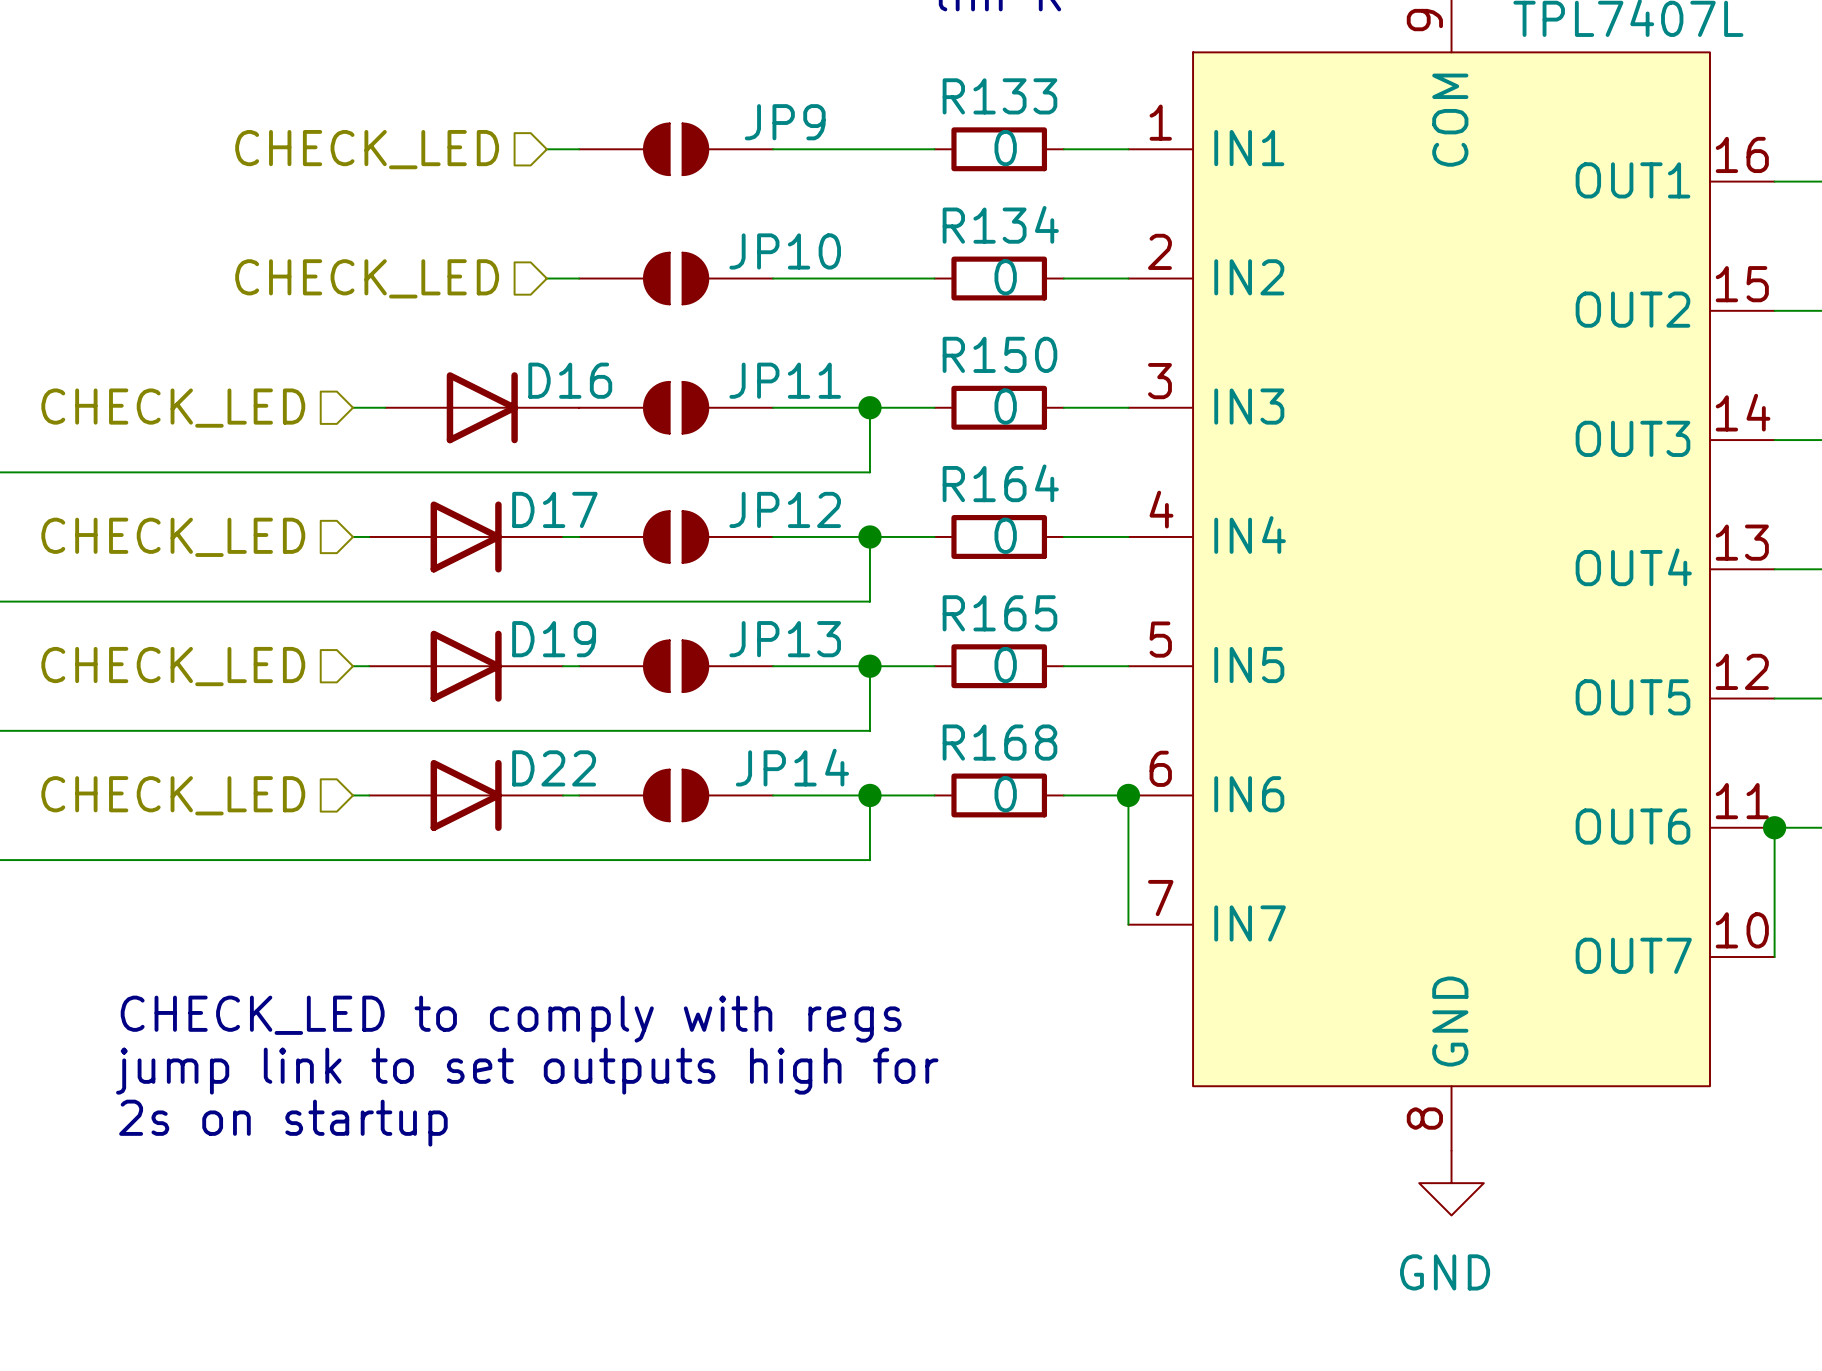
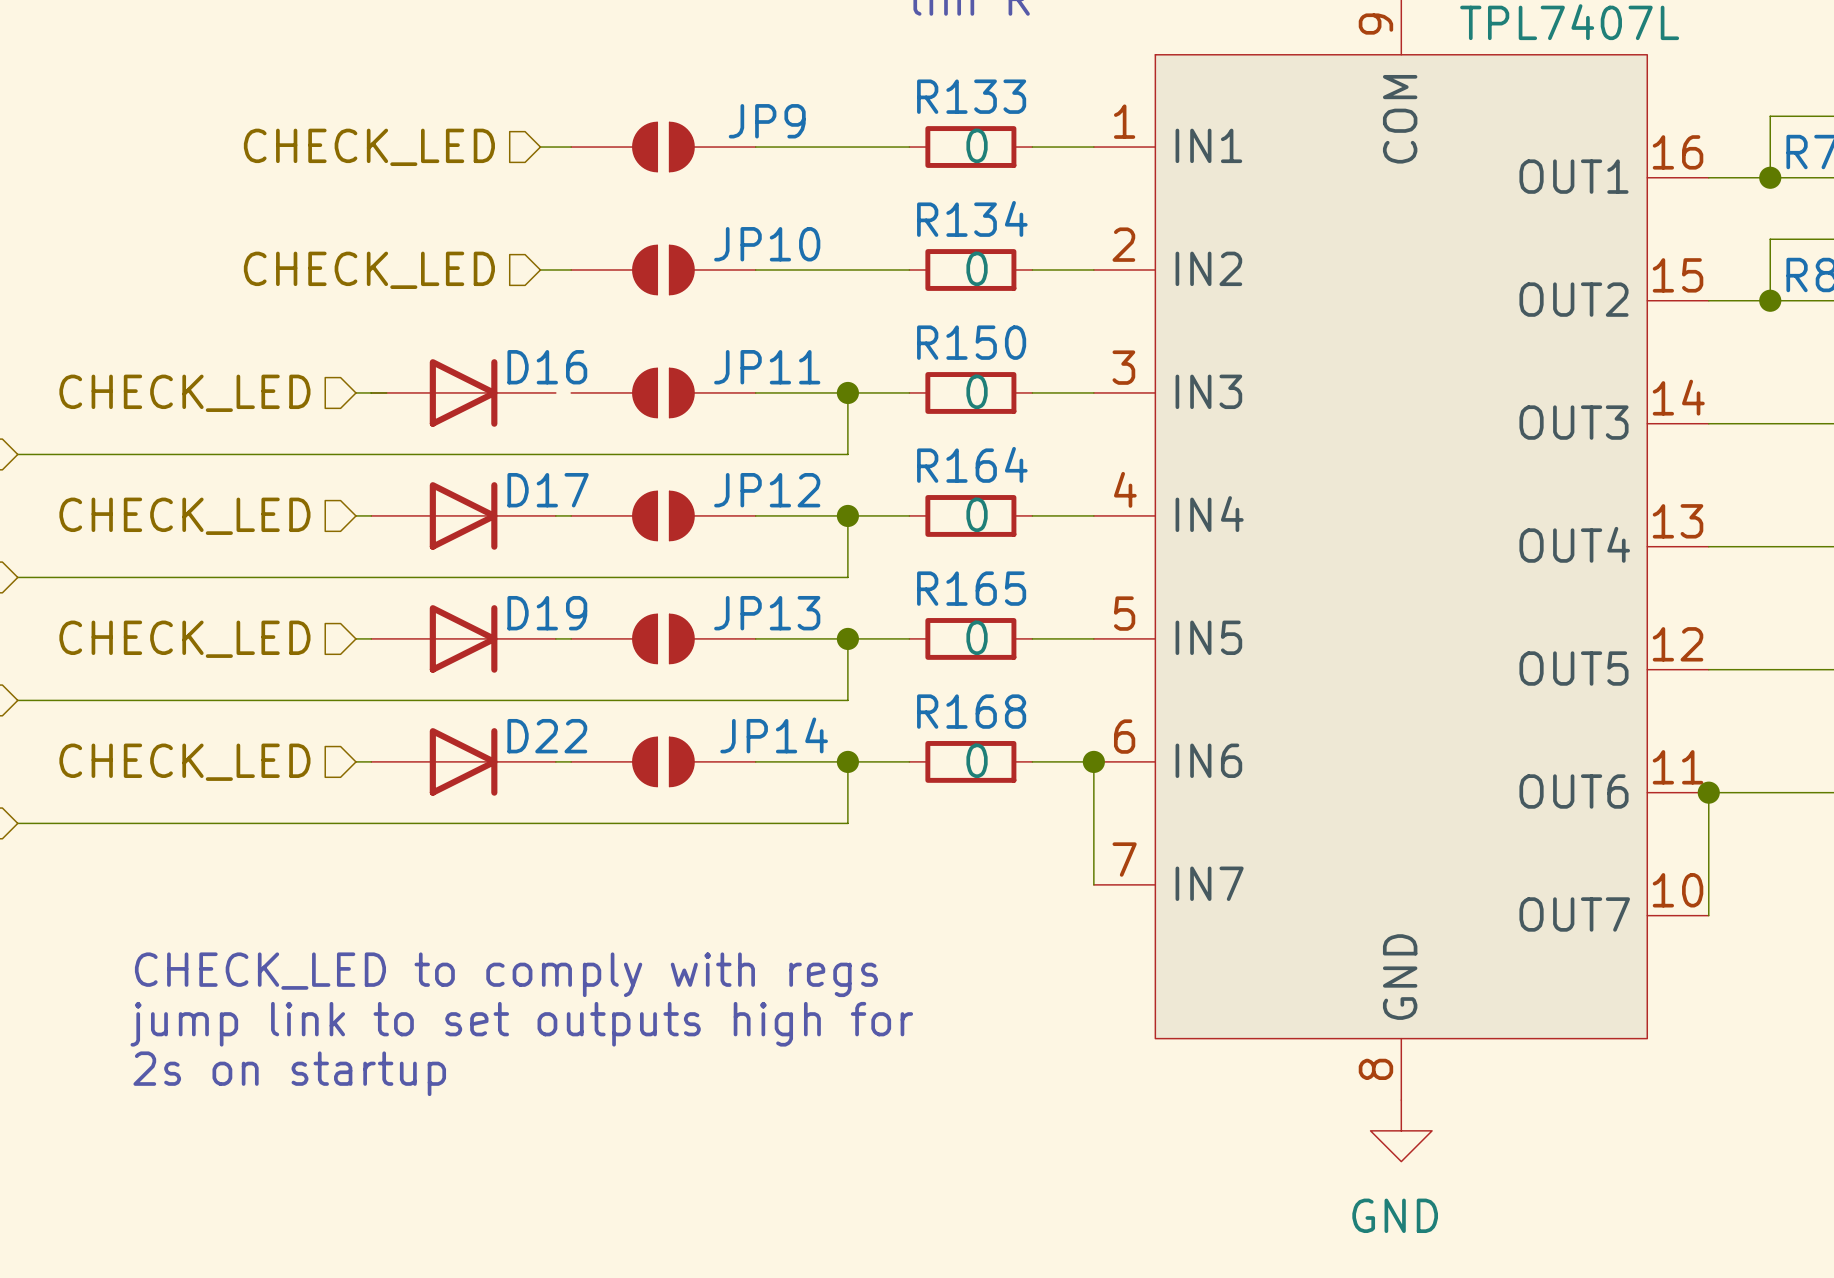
D16 position: (482, 407) -> (463, 392)

